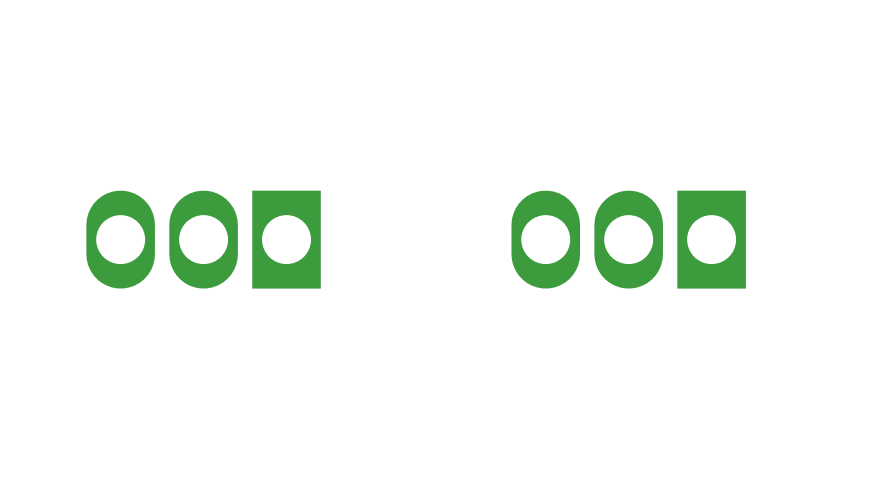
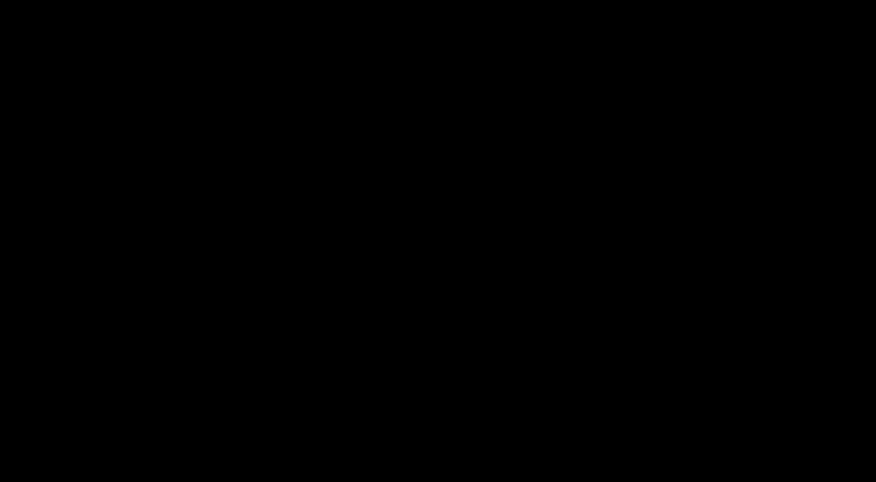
part: (203, 239) -> none
part: (628, 239) -> none

